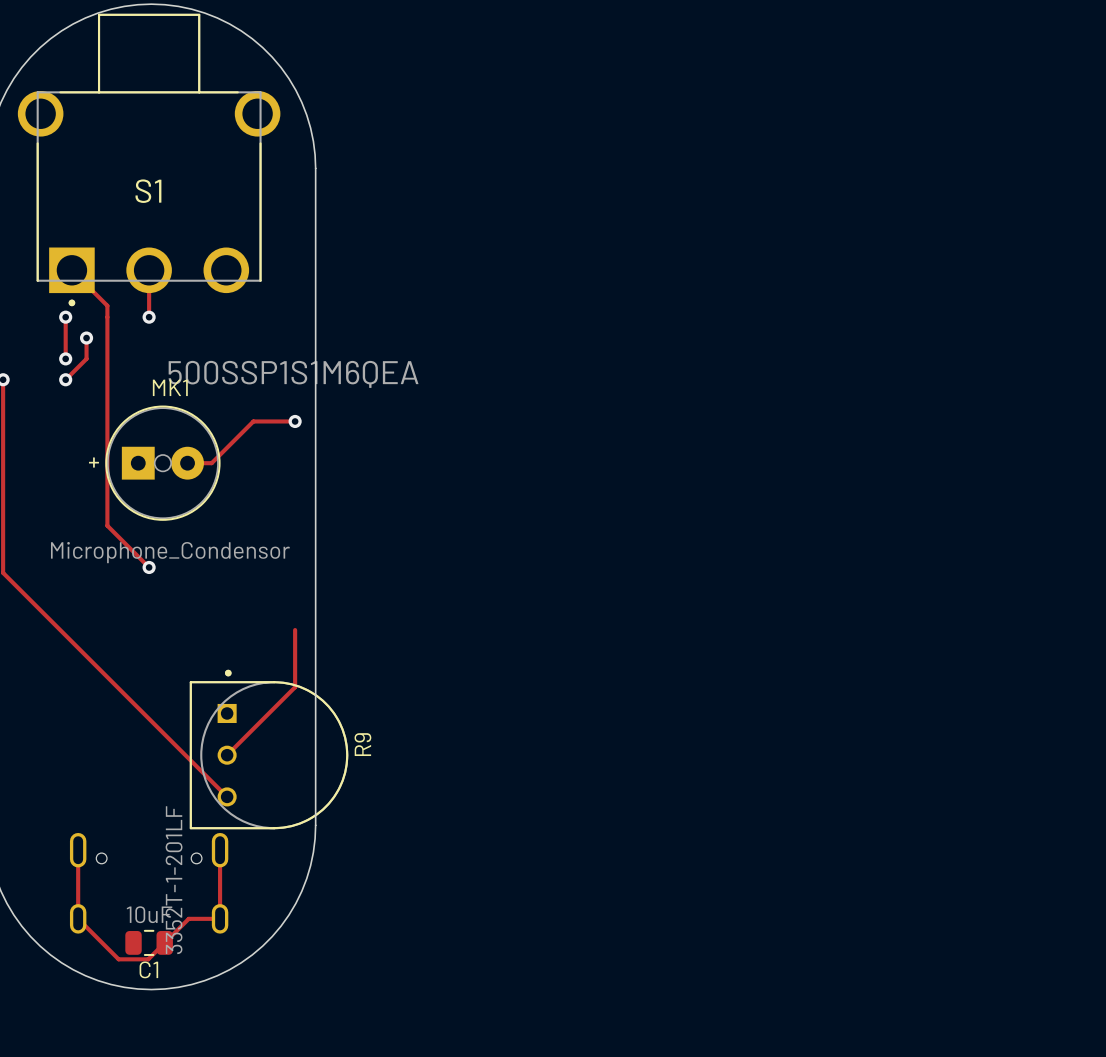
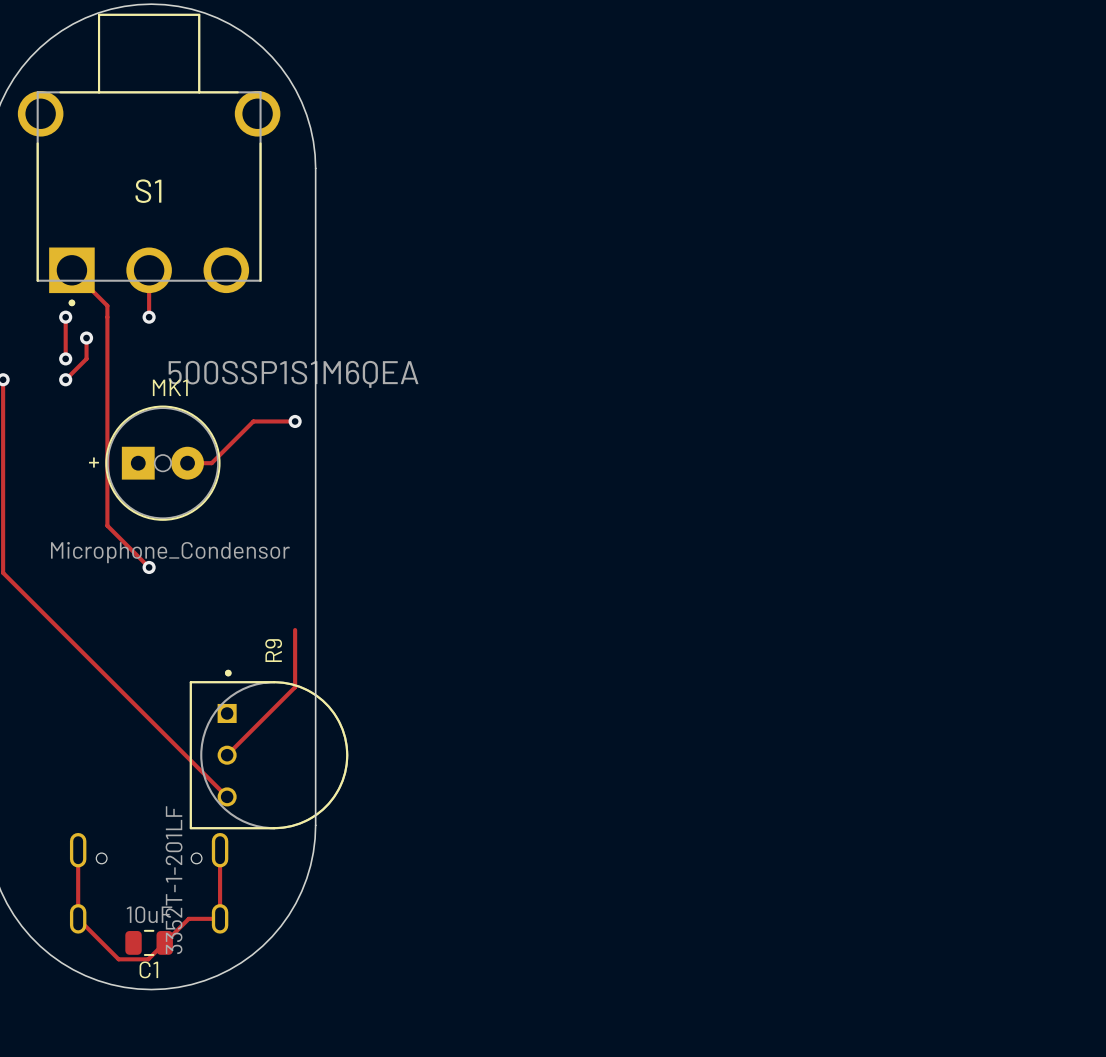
R9 name position: R9 (362, 744) -> R9 (273, 650)

